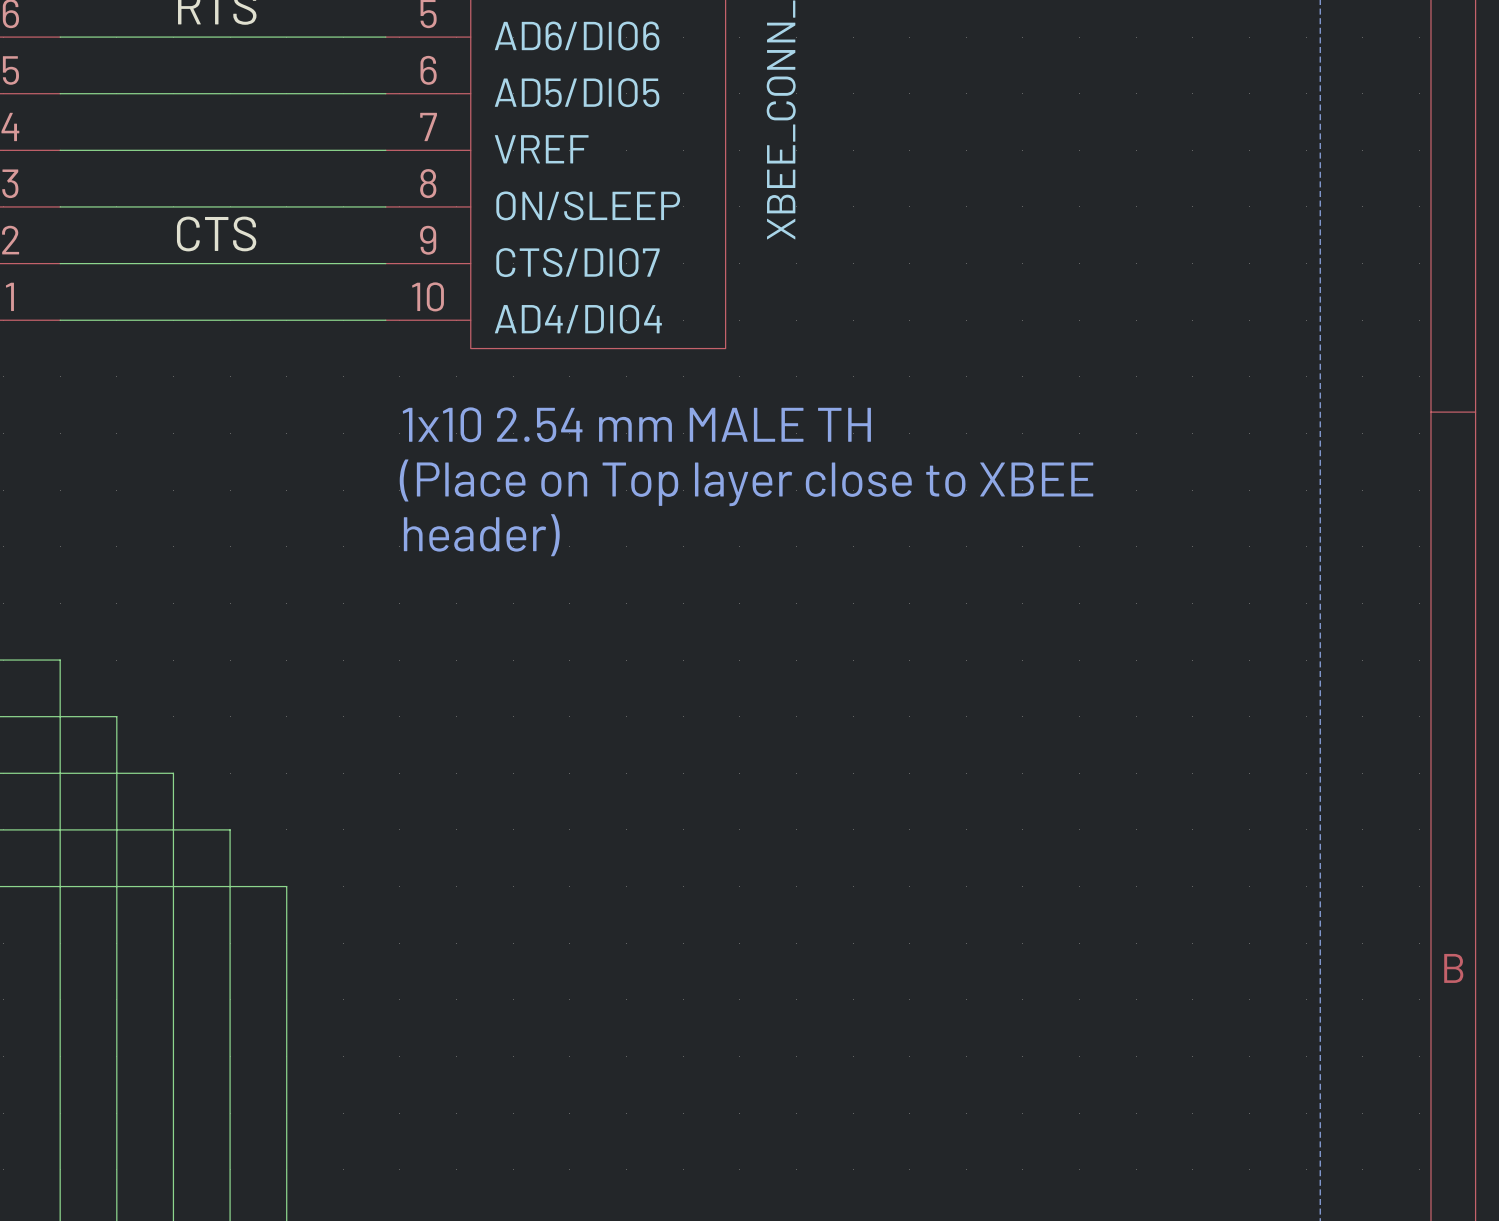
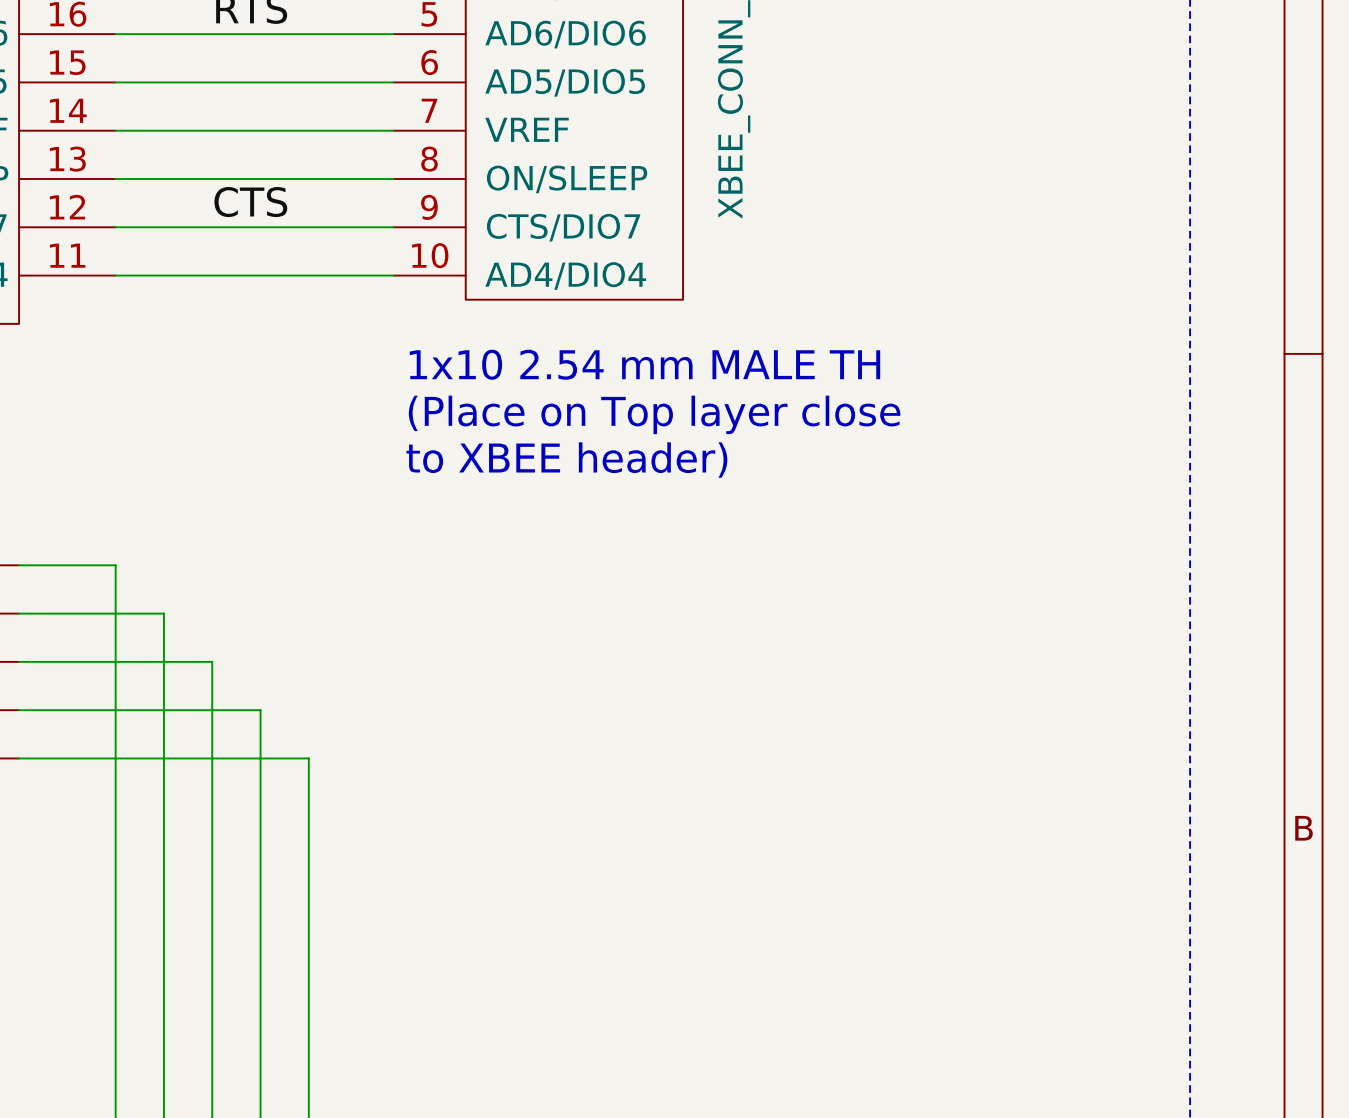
text: (Place on Top layer close to XBEE (746, 482) -> (Place on Top layer close (654, 414)
text: header) (481, 535) -> to XBEE header) (566, 460)

